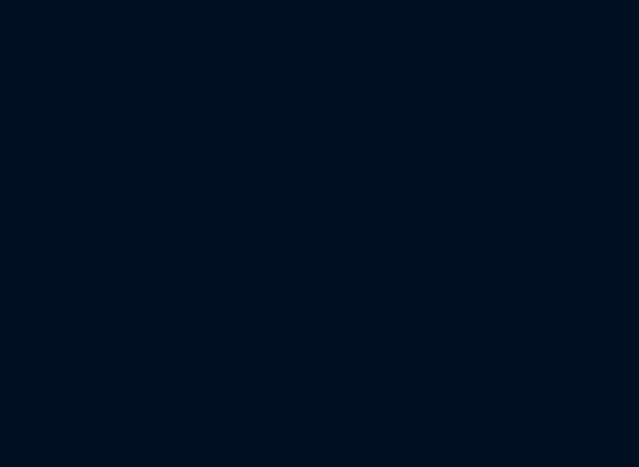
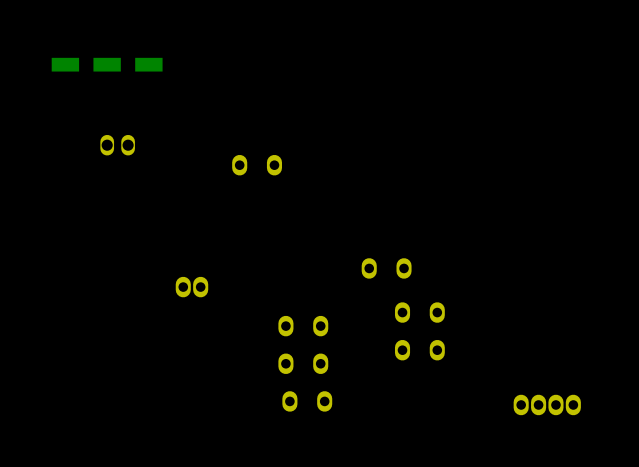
part: none -> (107, 64)
part: none -> (117, 145)
part: none -> (257, 165)
part: none -> (386, 268)
part: none -> (191, 287)
part: none -> (419, 312)
part: none -> (303, 326)
part: none -> (419, 350)
part: none -> (303, 363)
part: none -> (307, 401)
part: none -> (547, 404)

